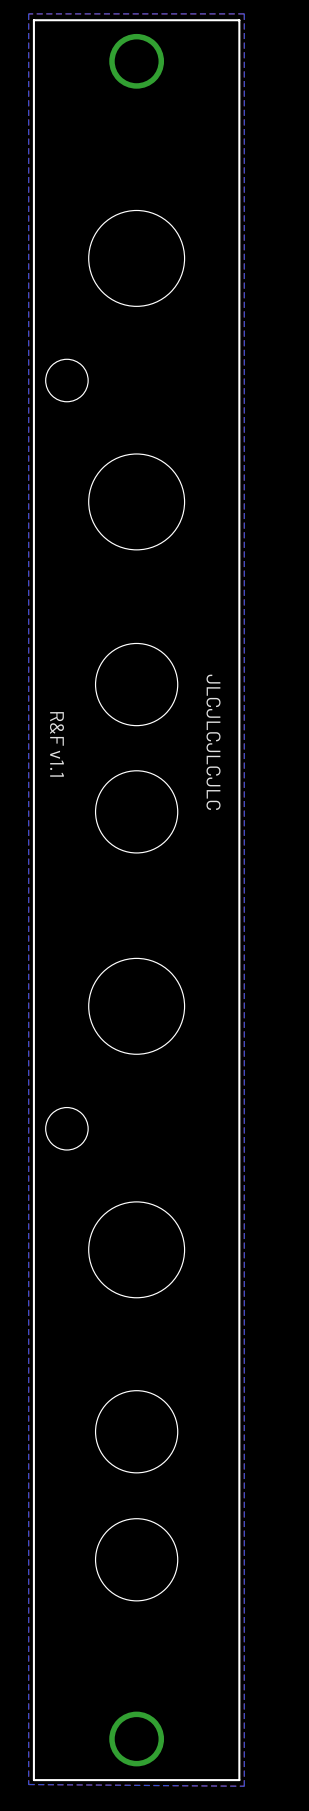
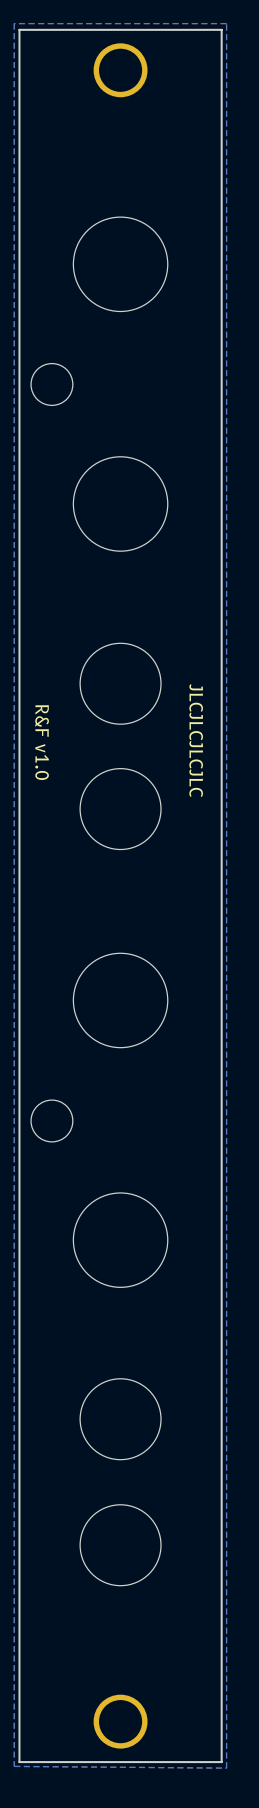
text: R&F v1.1 (56, 744) -> R&F v1.0 (42, 742)

